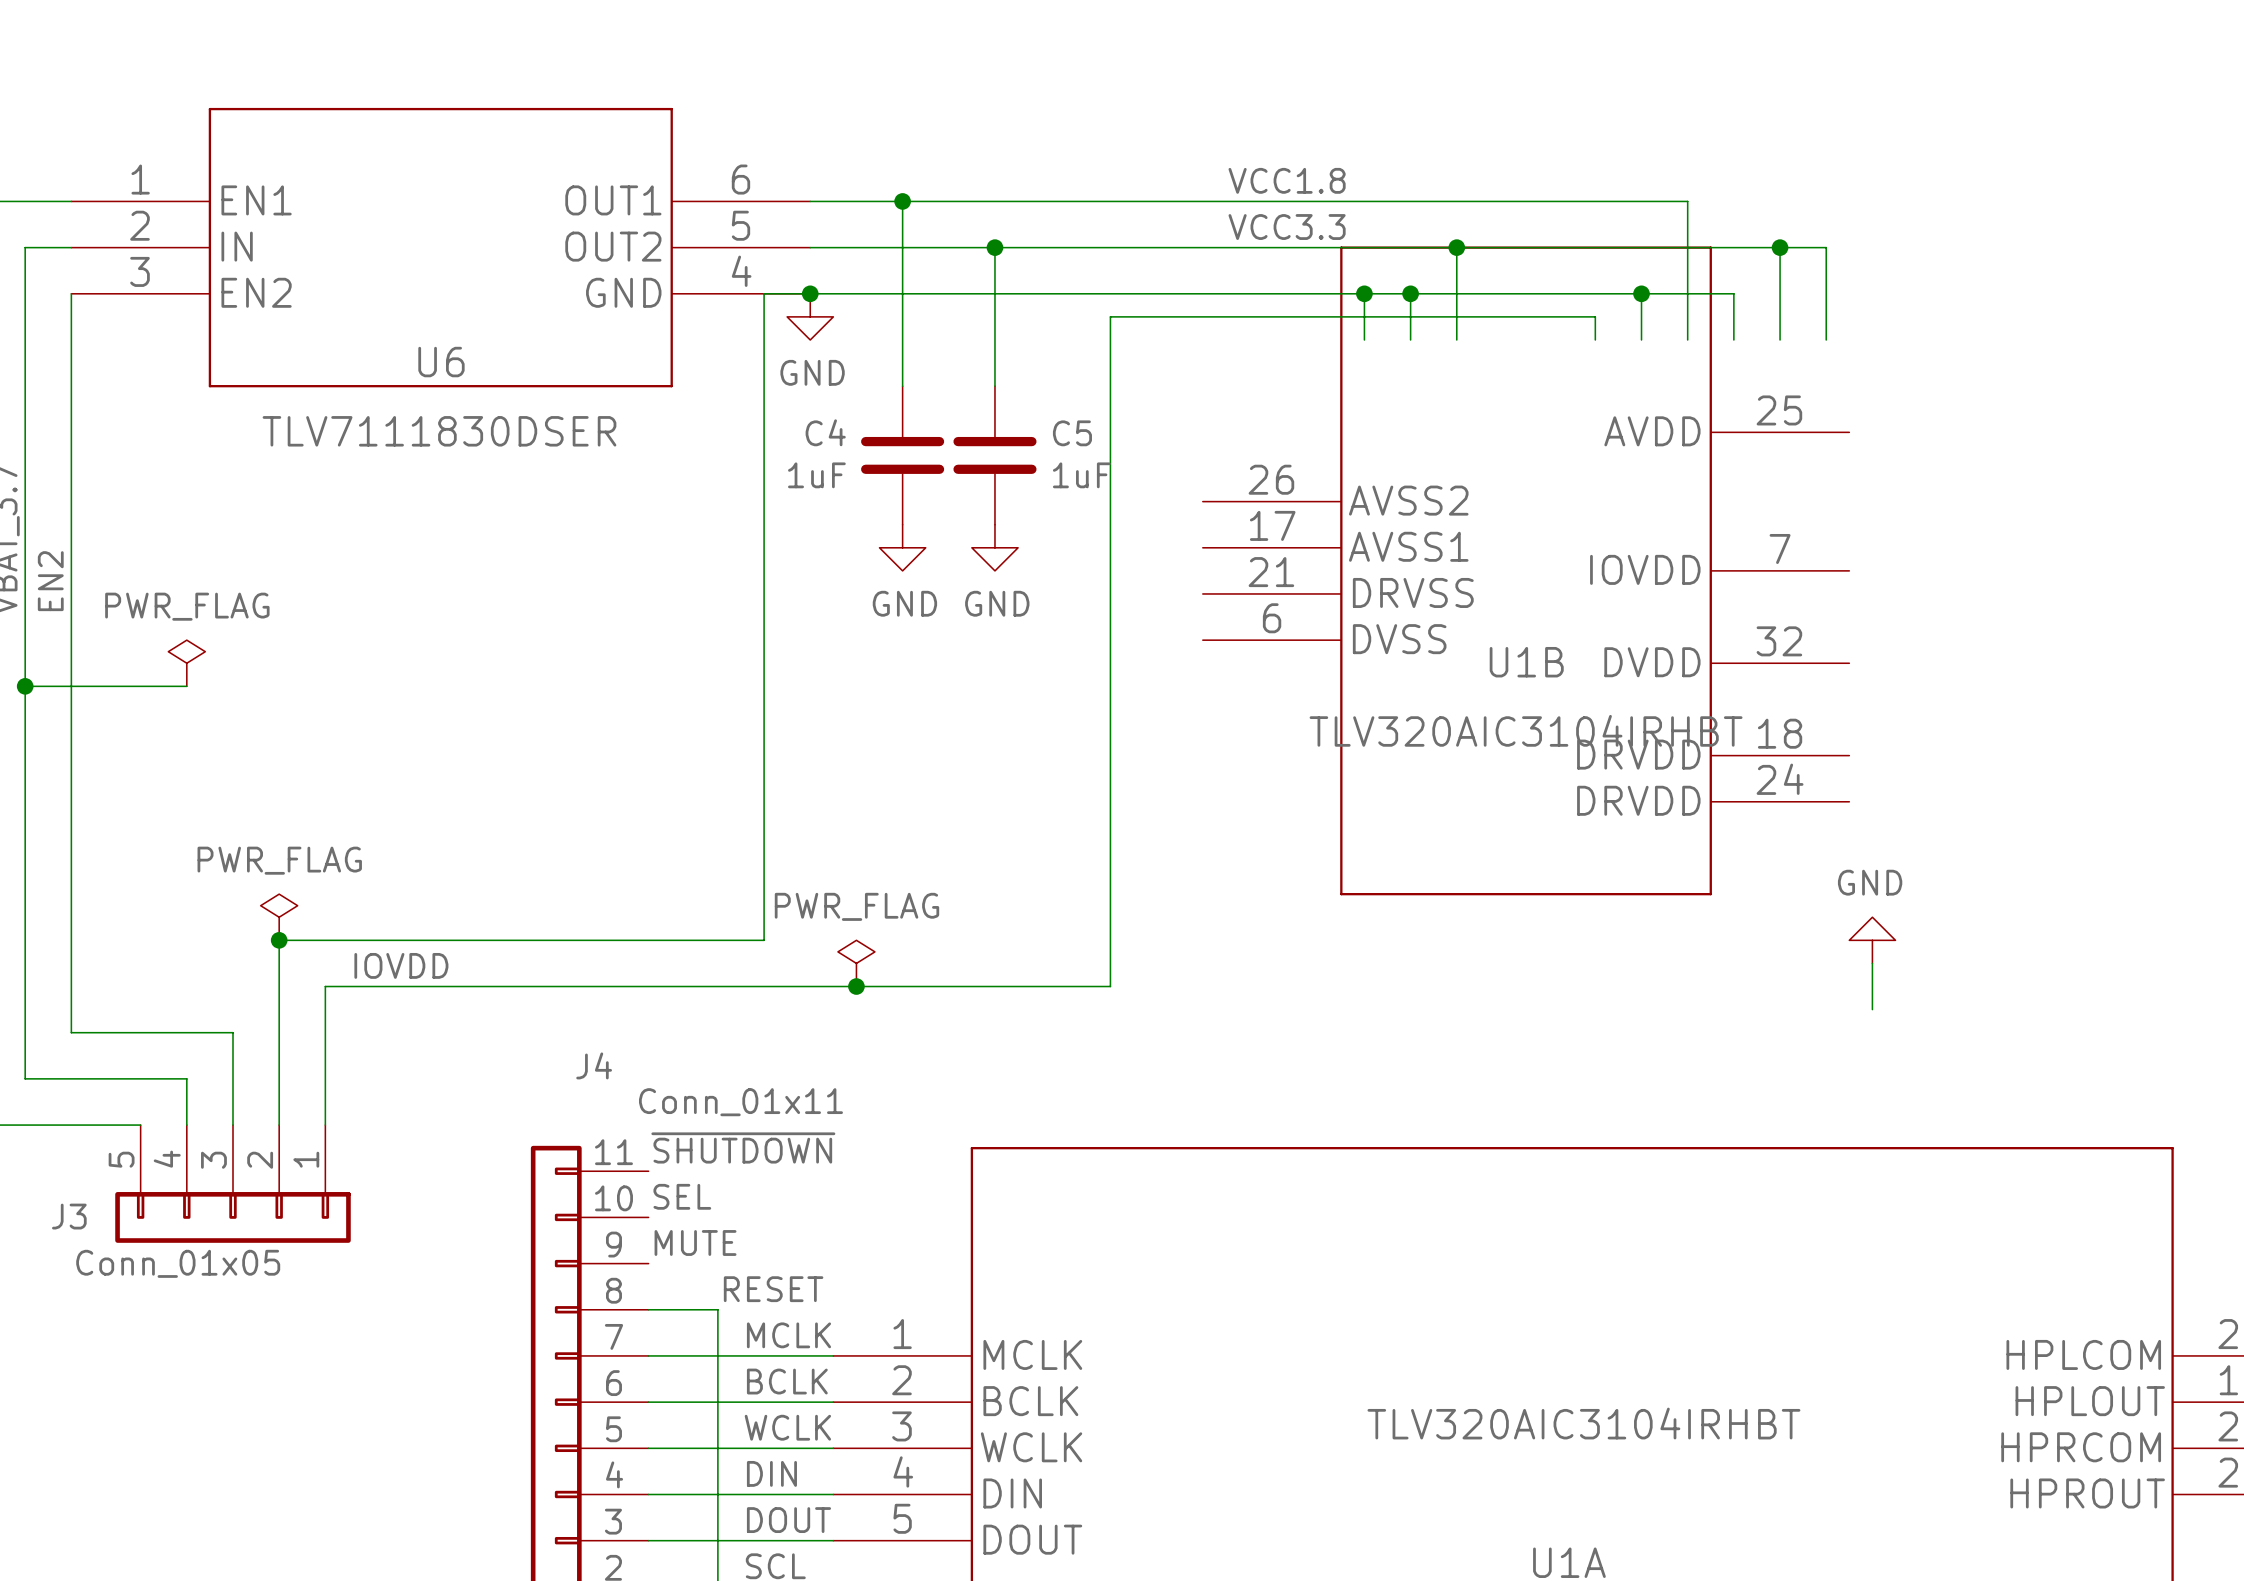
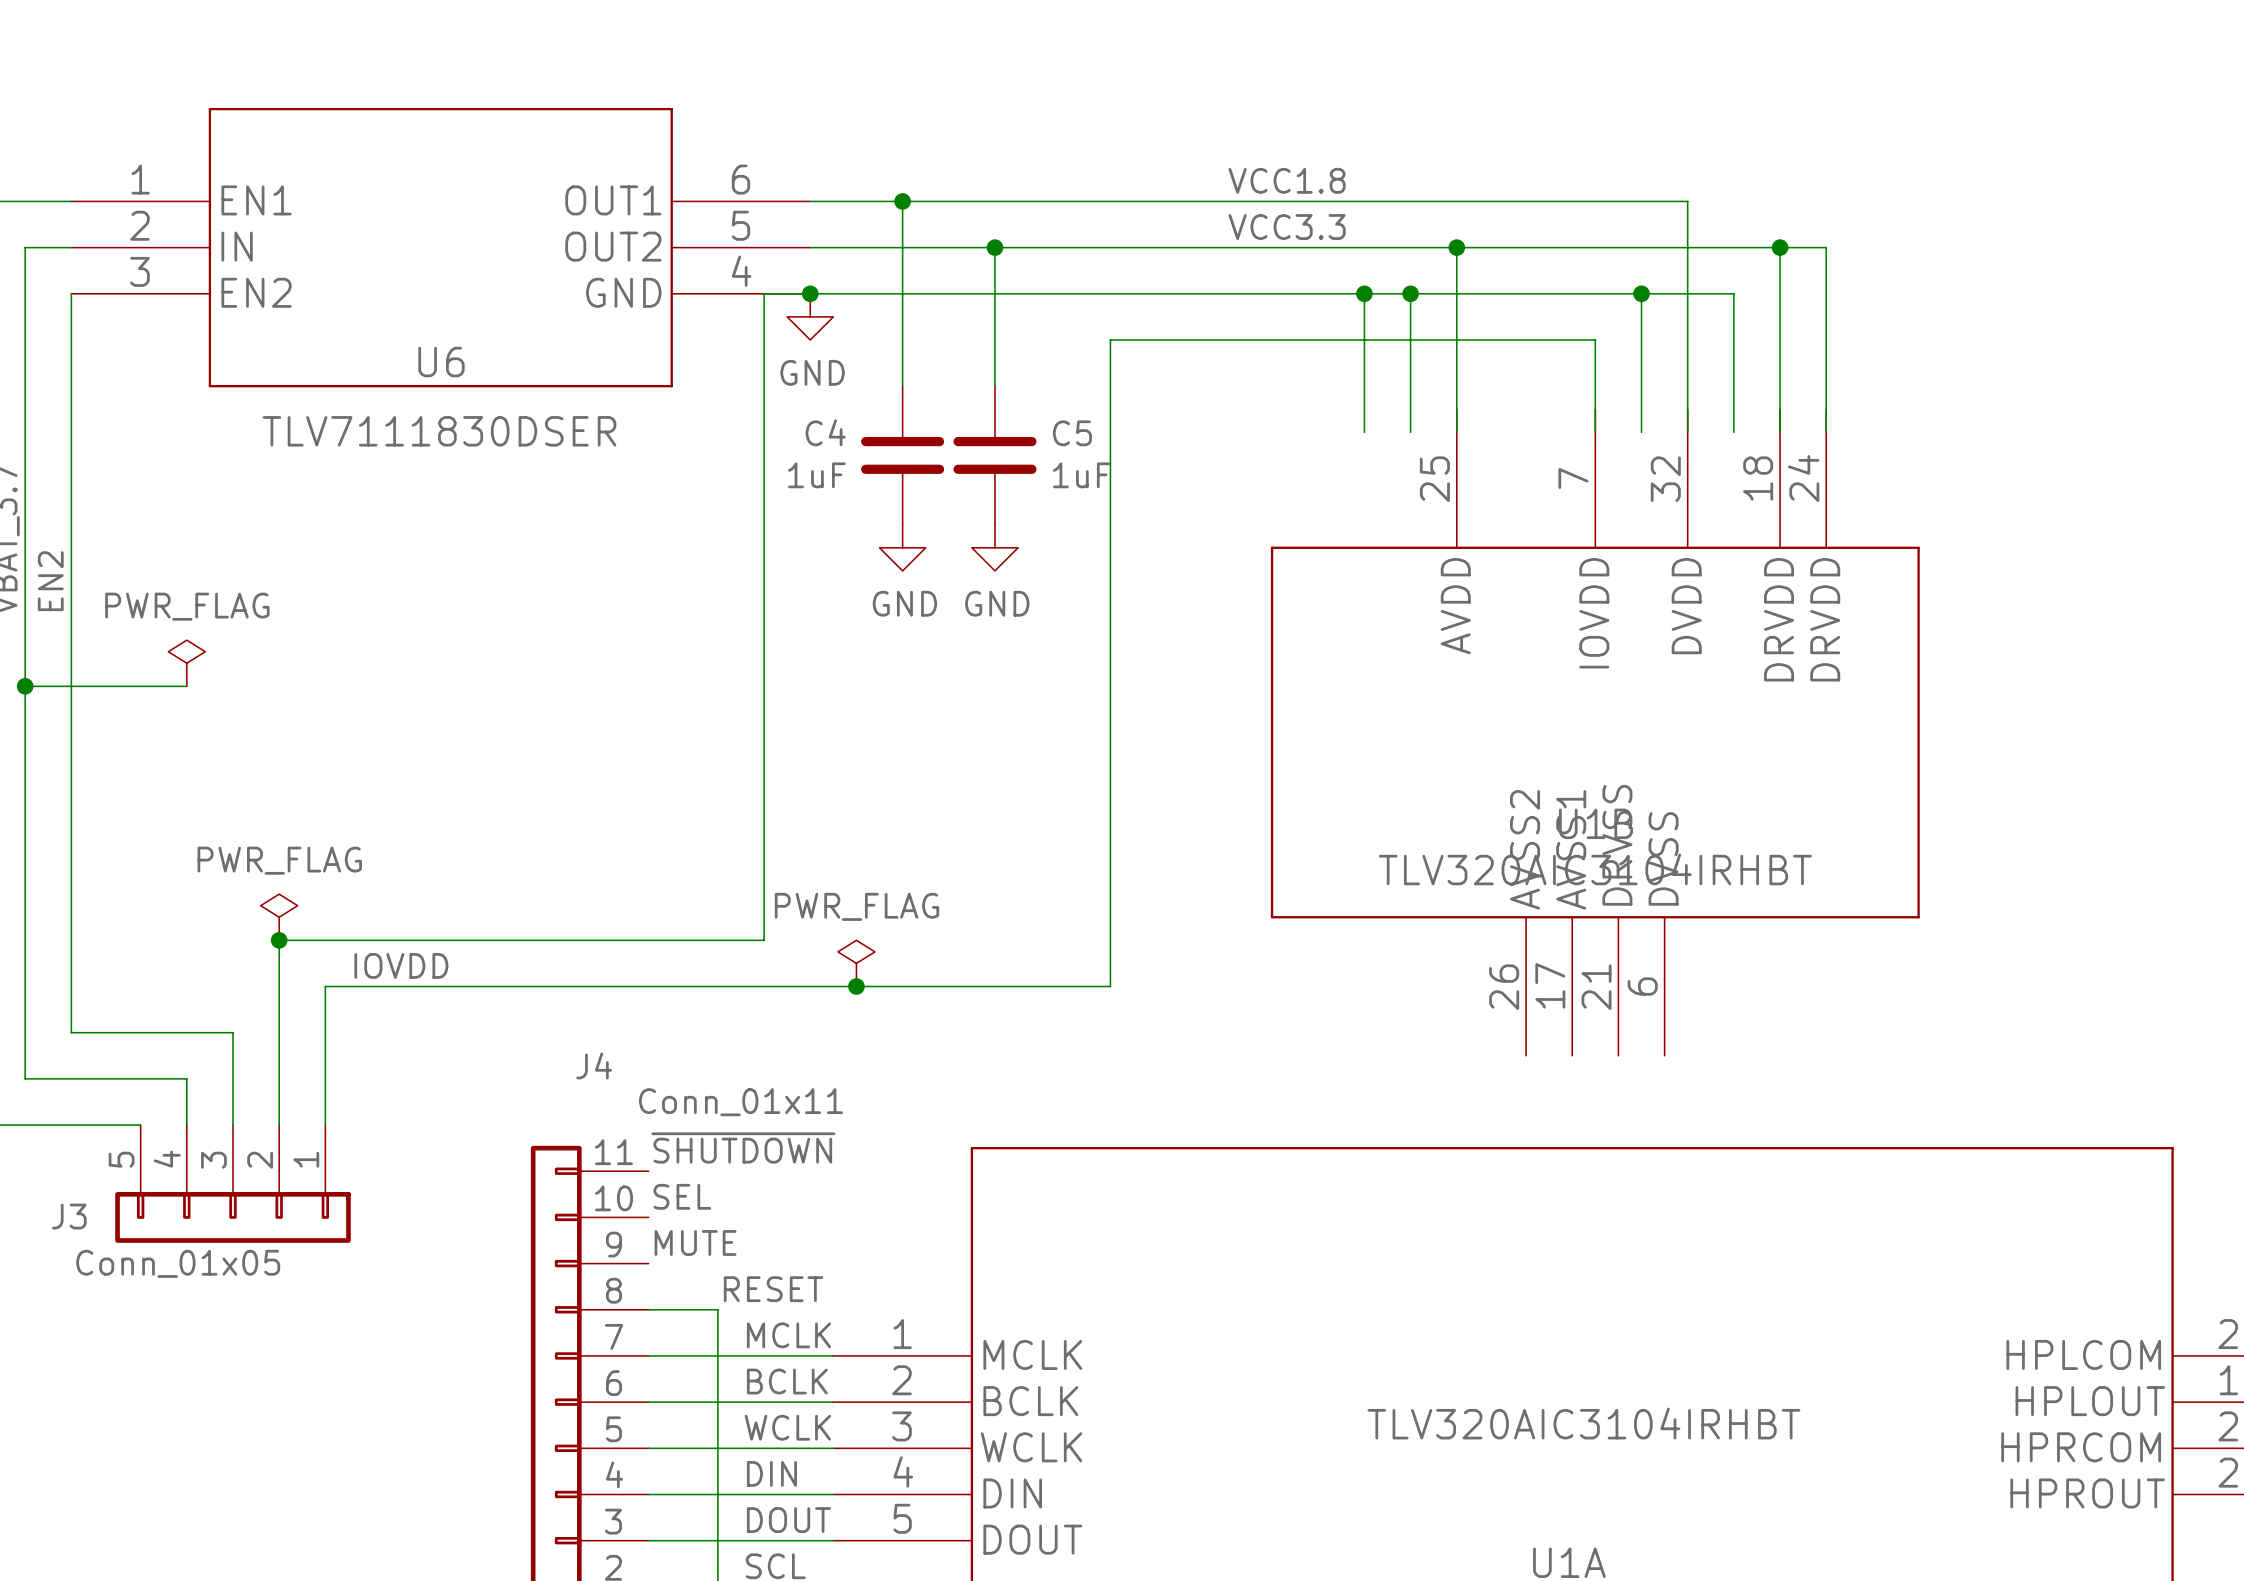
wire: (1110, 339) (1110, 316) (1595, 316) (1595, 339) -> (1110, 339) (1595, 339) (1595, 432)
wire: none -> (1364, 339) (1364, 432)
wire: none -> (1410, 339) (1410, 432)
wire: none -> (1456, 339) (1456, 432)
wire: none -> (1641, 339) (1641, 432)
wire: none -> (1687, 339) (1687, 432)
wire: none -> (1733, 339) (1733, 432)
wire: none -> (1780, 339) (1780, 432)
wire: none -> (1826, 339) (1826, 432)
U1B rotation: 0° (1526, 570) -> 90° counterclockwise (1595, 732)
power symbol: GND (1872, 940) -> none
wire: (1872, 963) (1872, 1009) -> none

